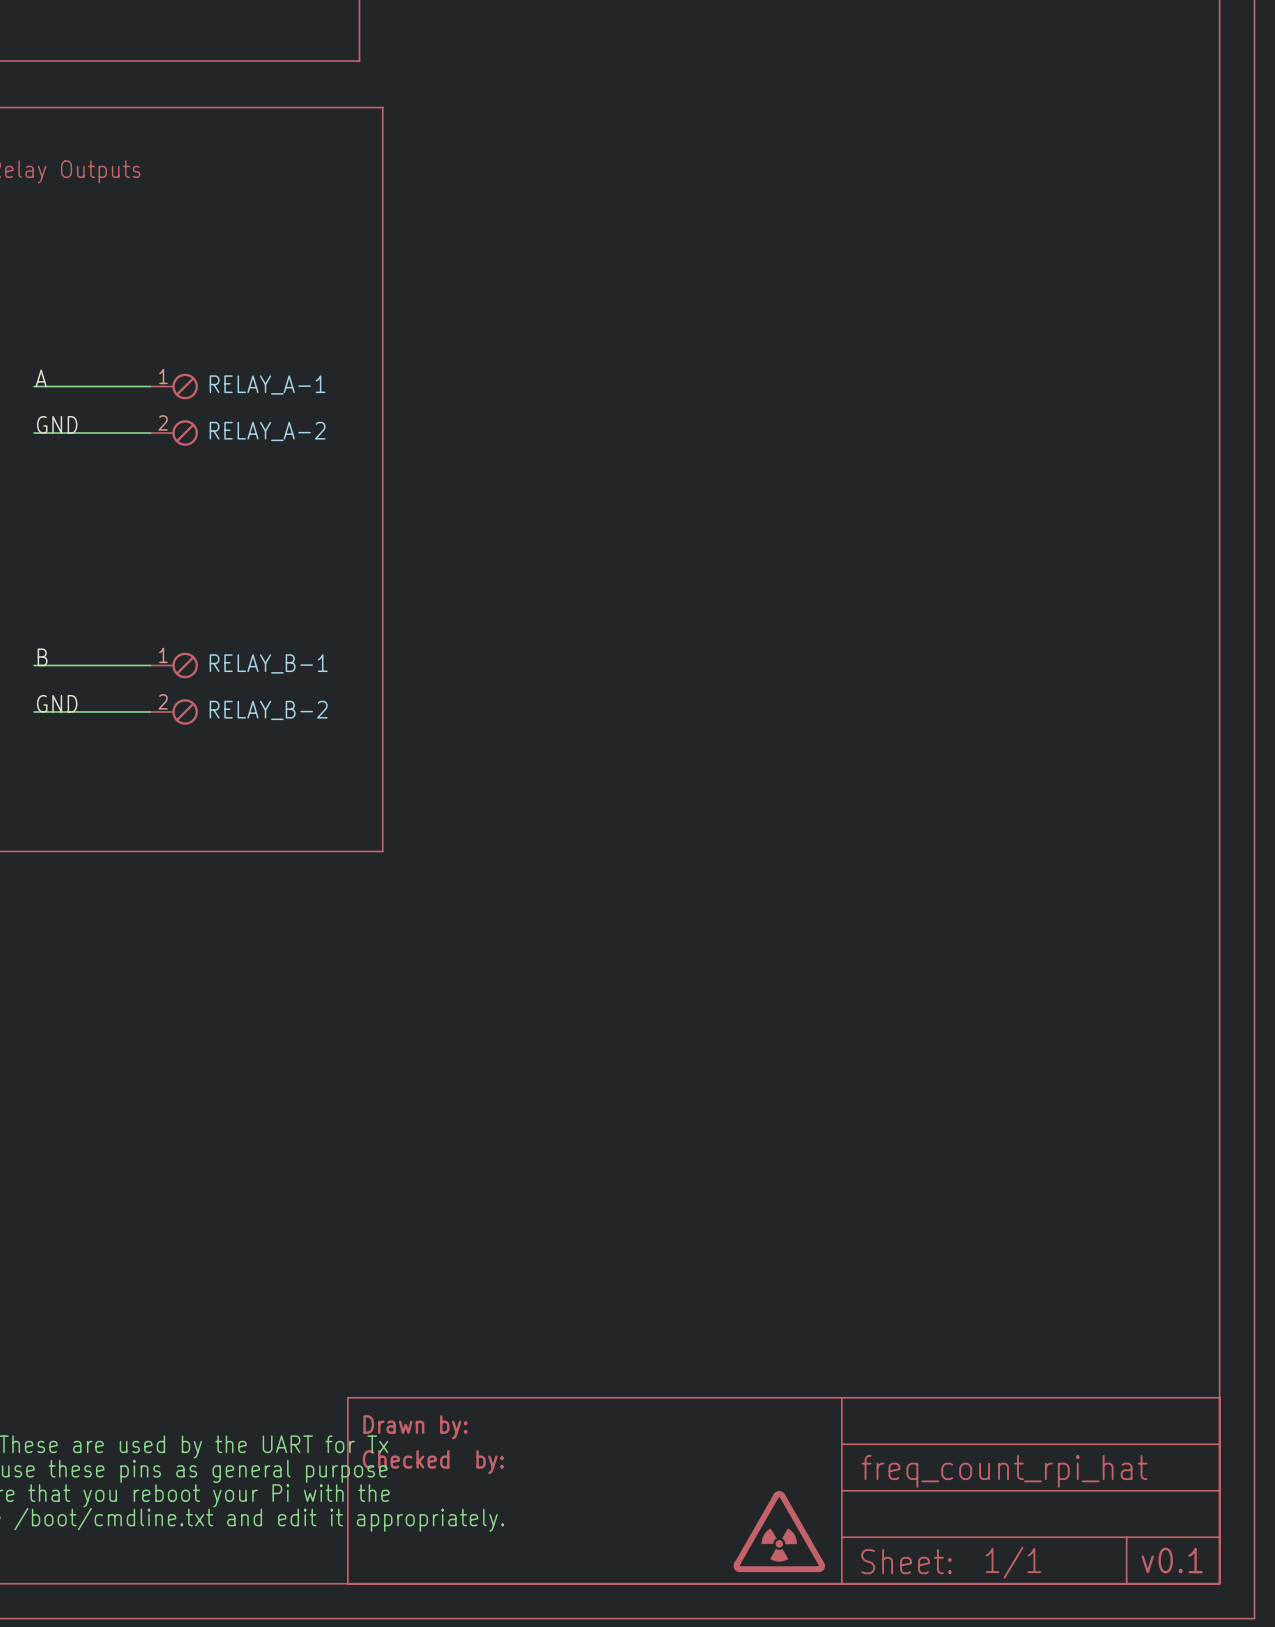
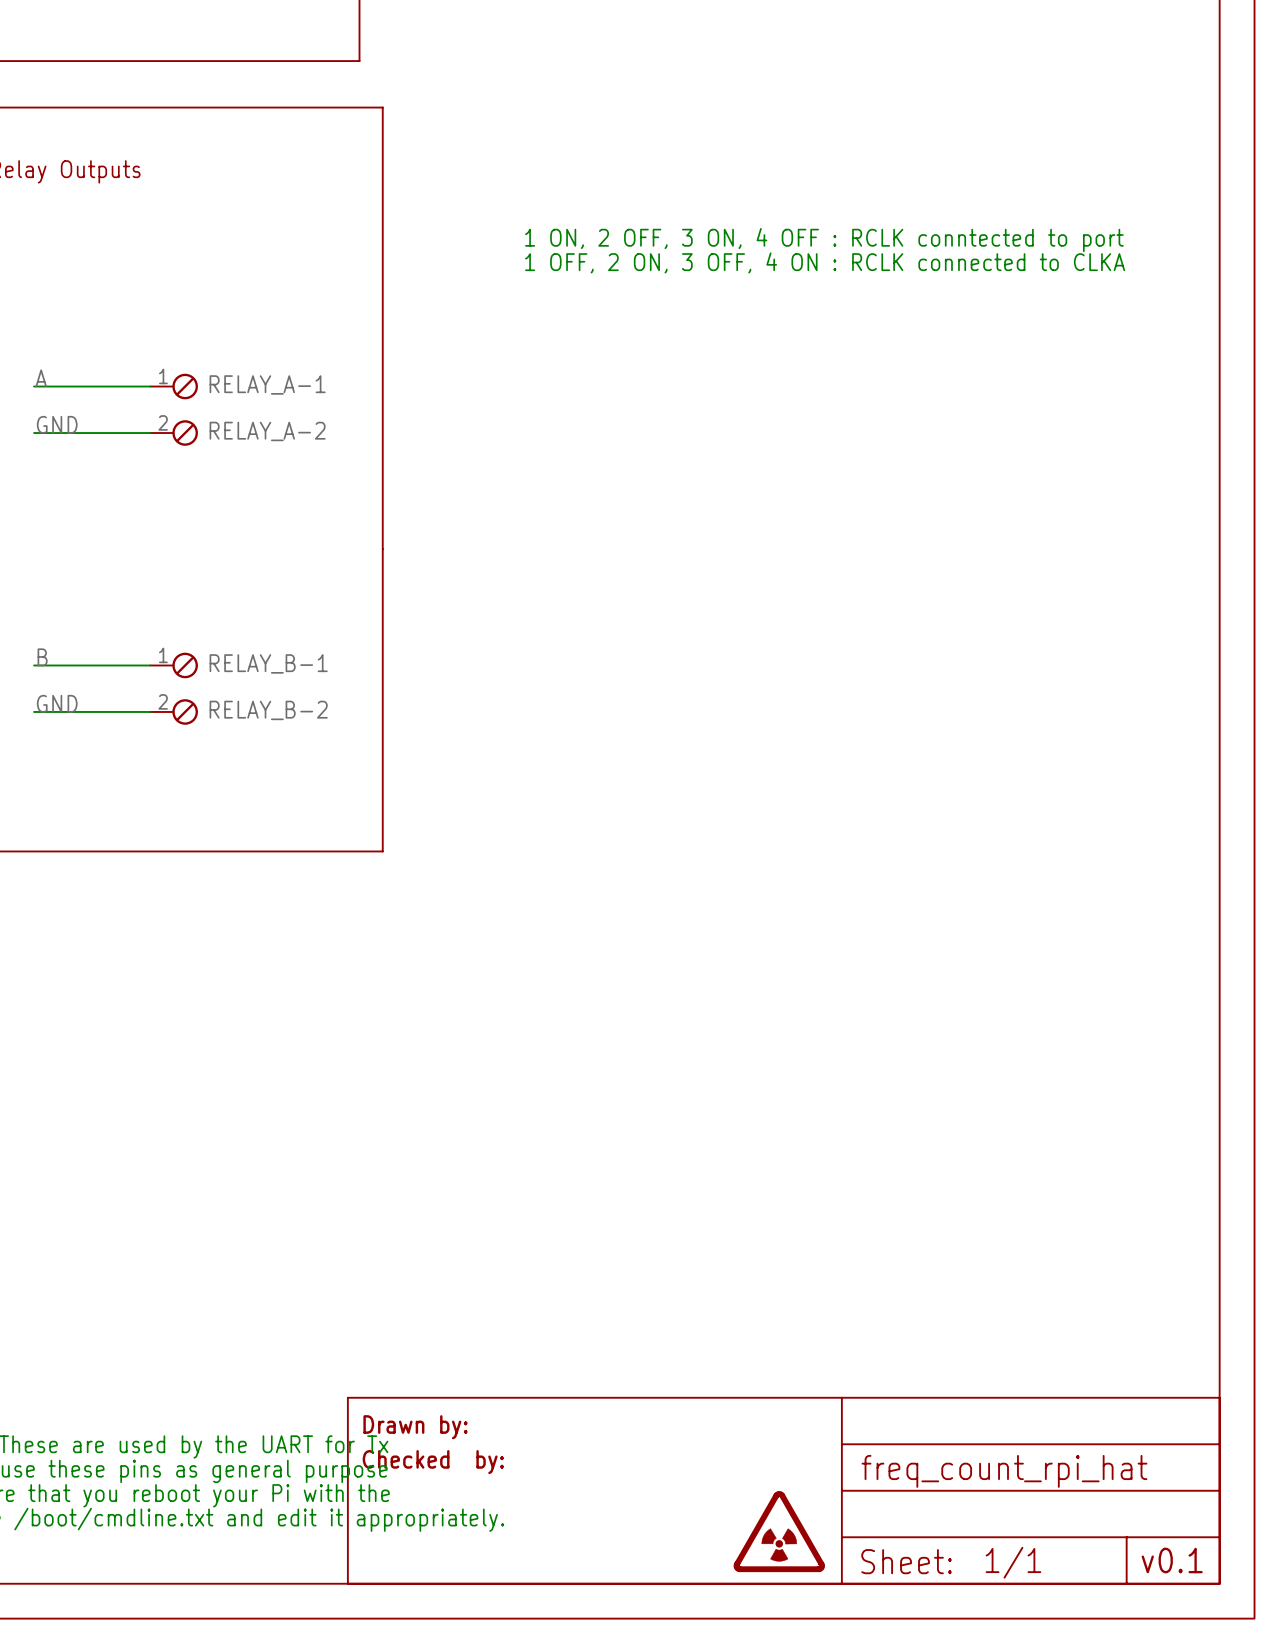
text: none -> 1 ON, 2 OFF, 3 ON, 4 OFF : RCLK conntected to port (824, 240)
text: none -> 1 OFF, 2 ON, 3 OFF, 4 ON : RCLK connected to CLKA (825, 262)

